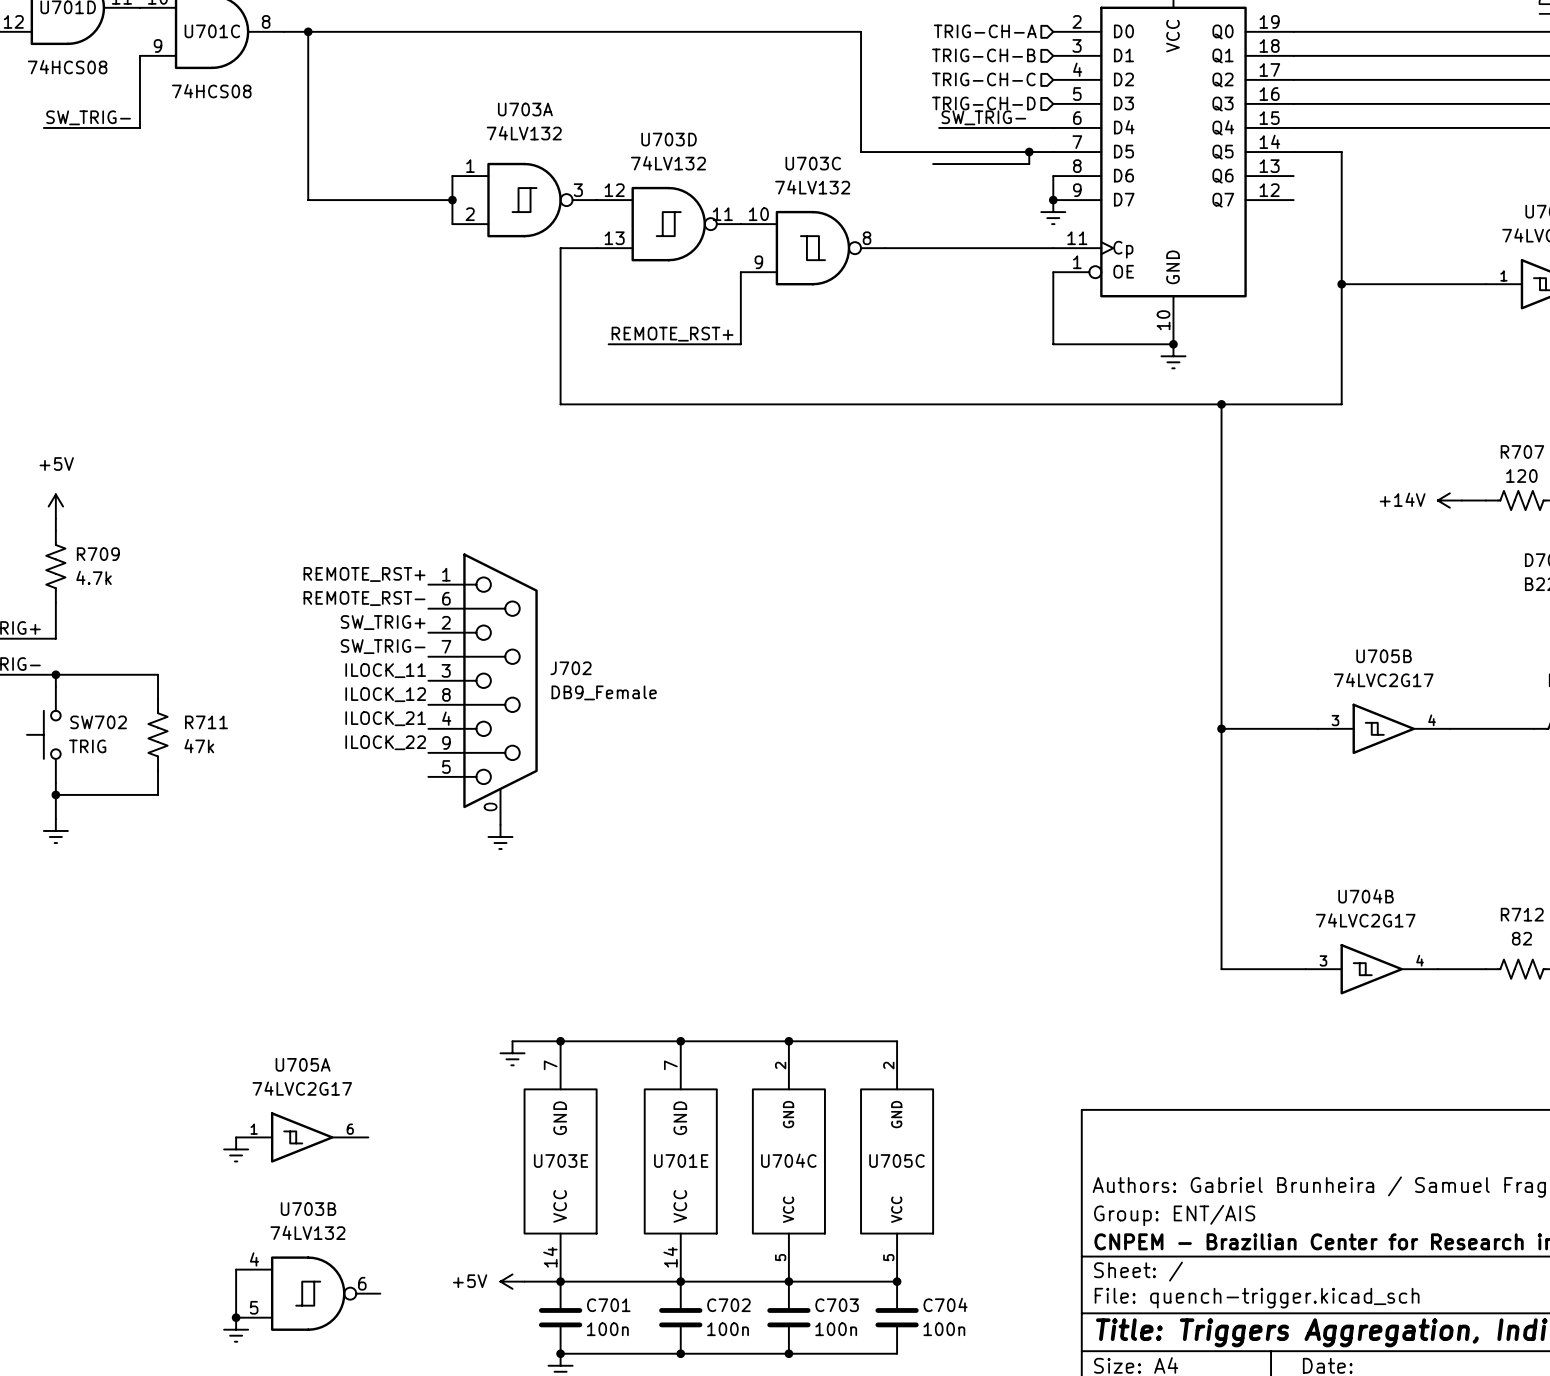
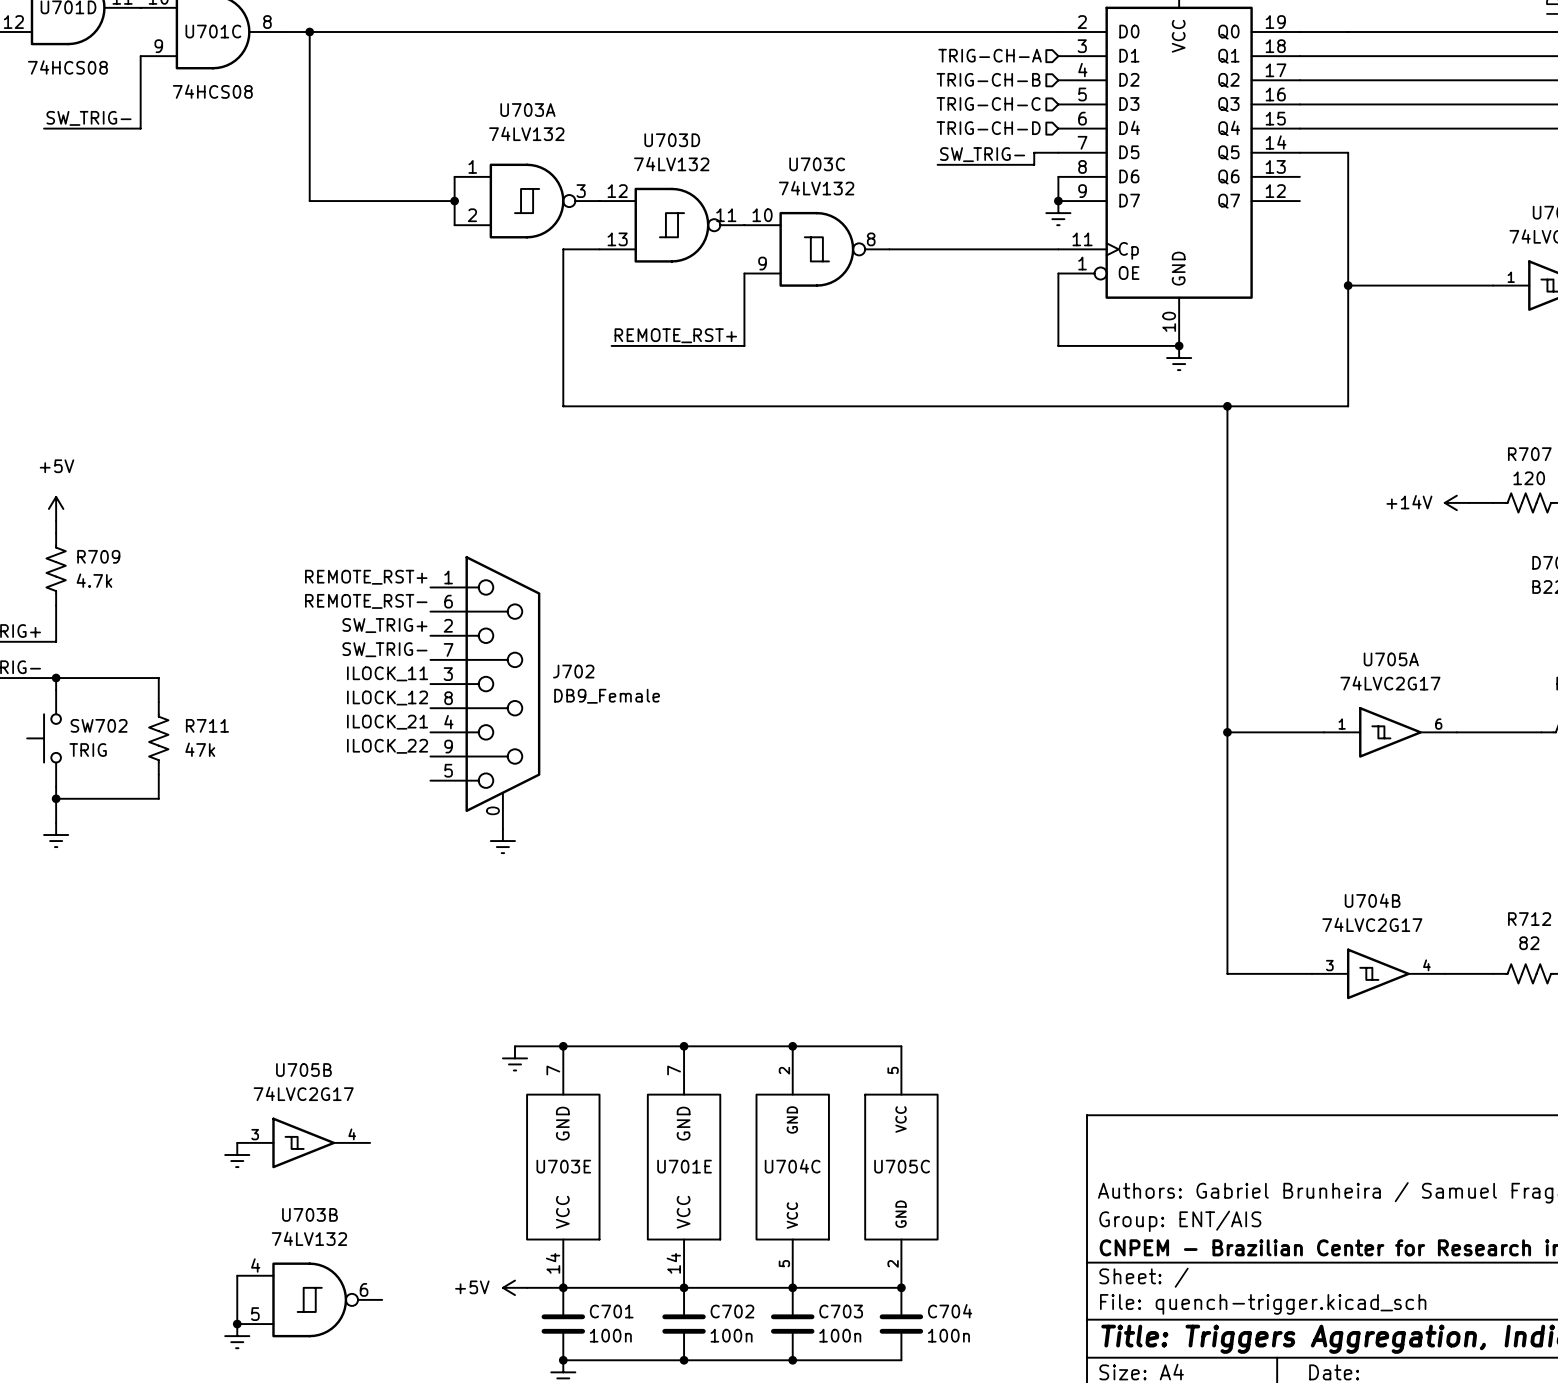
wire: (861, 31) (861, 152) (1029, 152) -> (865, 31) (1058, 31)
hierarchical label: TRIG-CH-A (985, 31) -> none
hierarchical label: TRIG-CH-B (983, 55) -> TRIG-CH-A (990, 55)
hierarchical label: TRIG-CH-C (983, 79) -> TRIG-CH-B (988, 79)
hierarchical label: TRIG-CH-D (983, 103) -> TRIG-CH-C (988, 103)
label position: SW_TRIG- (983, 117) -> SW_TRIG- (982, 154)
wire: (939, 127) (1053, 127) -> none
hierarchical label: none -> TRIG-CH-D (988, 128)
junction: (1029, 152) -> none
U705B position: (1383, 728) -> (303, 1142)
U705A position: (302, 1137) -> (1390, 732)
U705C rotation: 0° (897, 1161) -> 180° (901, 1167)

